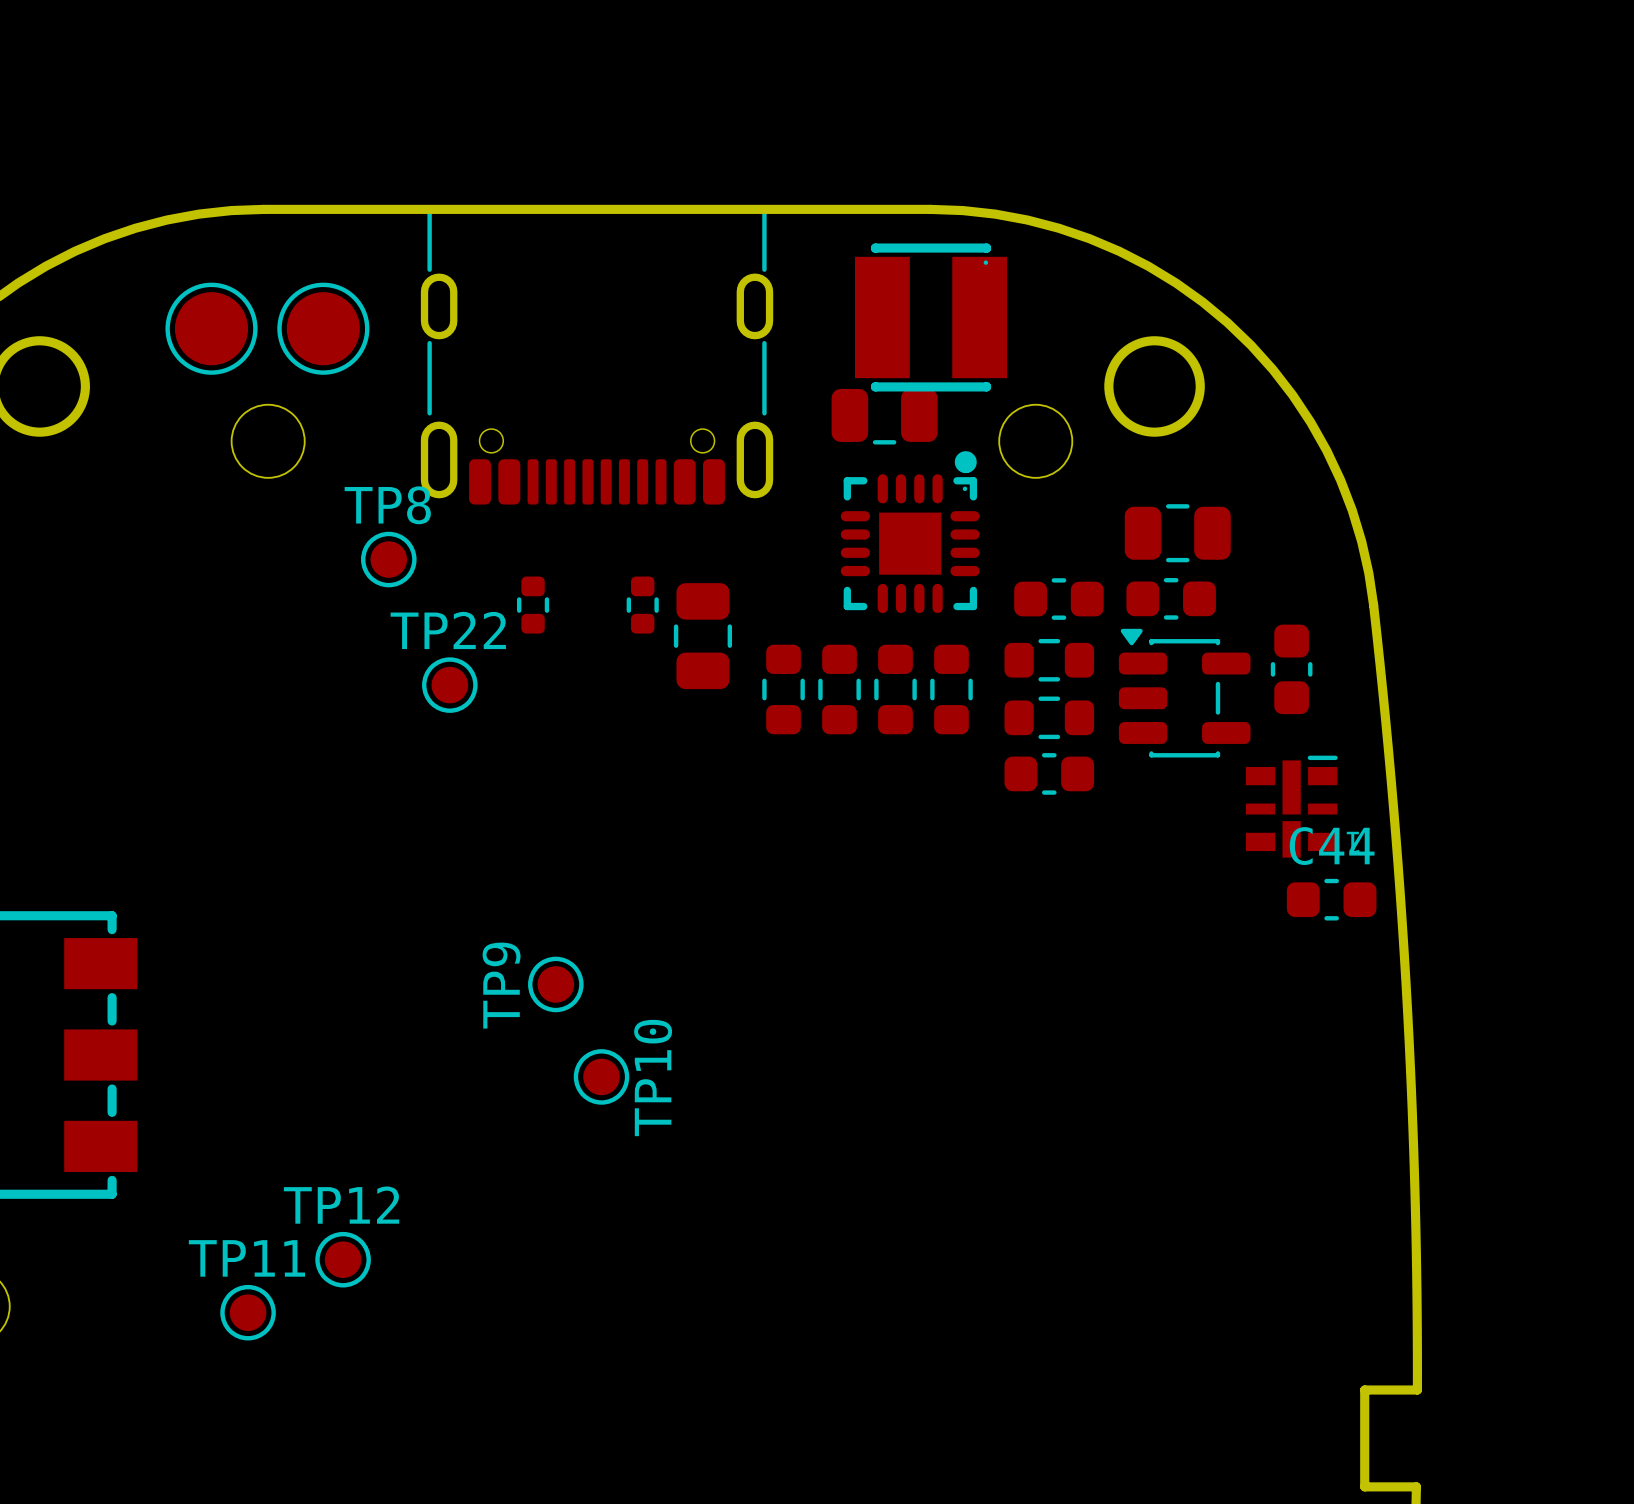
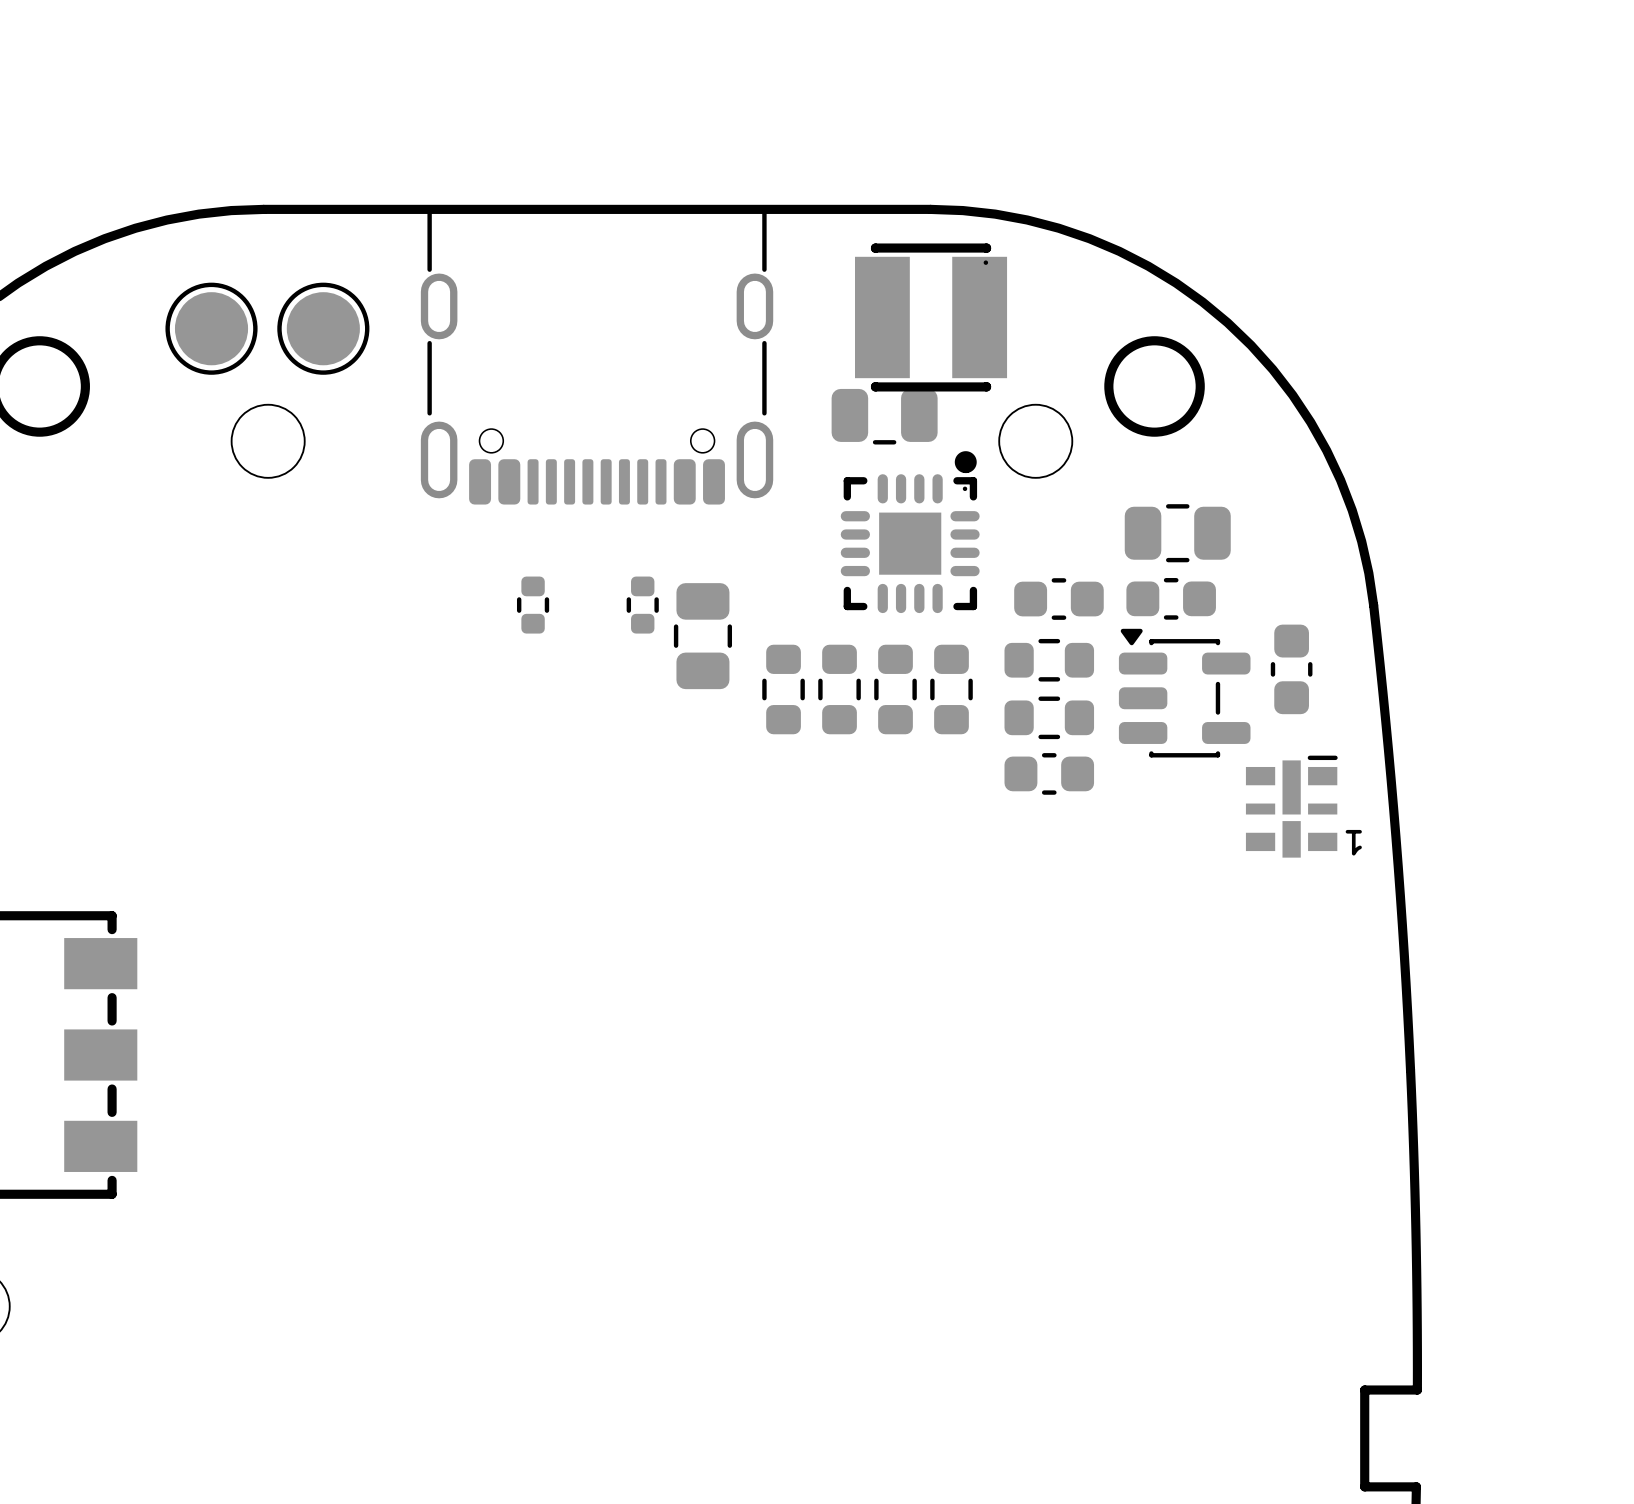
TP8: (388, 559) -> none
TP22: (449, 685) -> none
C44: (1331, 899) -> none
TP9: (555, 984) -> none
TP10: (601, 1076) -> none
TP12: (343, 1259) -> none
TP11: (248, 1312) -> none

